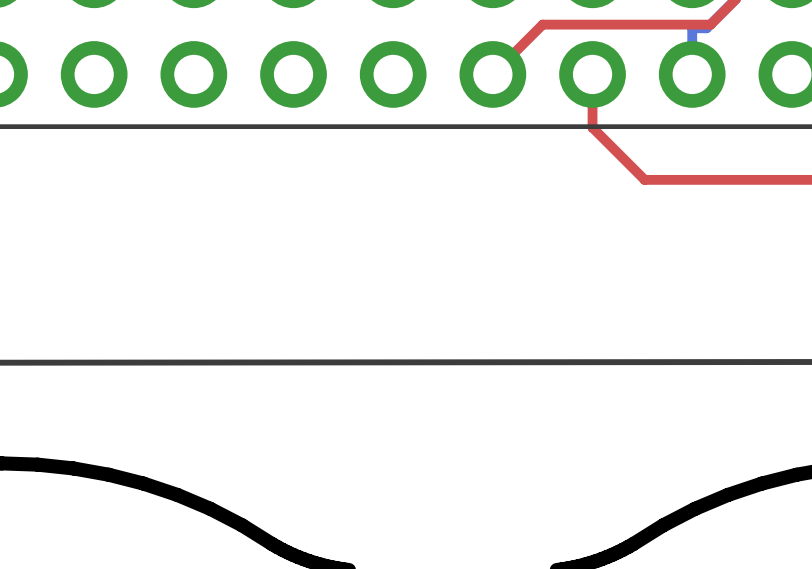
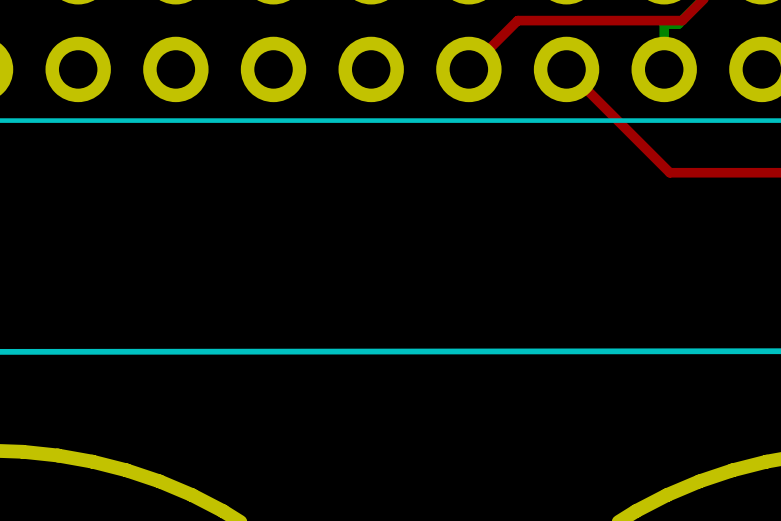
top track: (592, 74) (592, 127) (644, 179) (697, 179) -> (566, 69) (669, 172)

